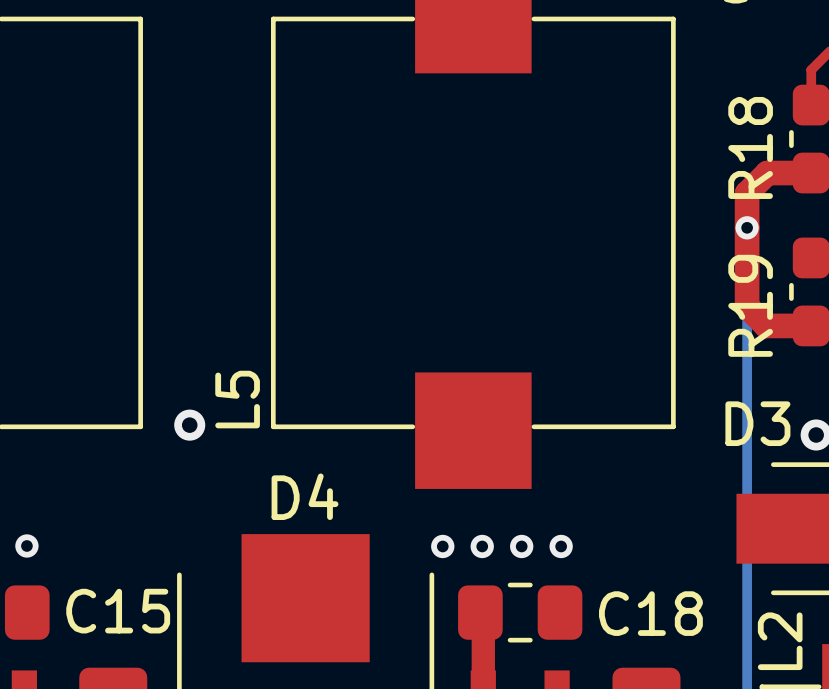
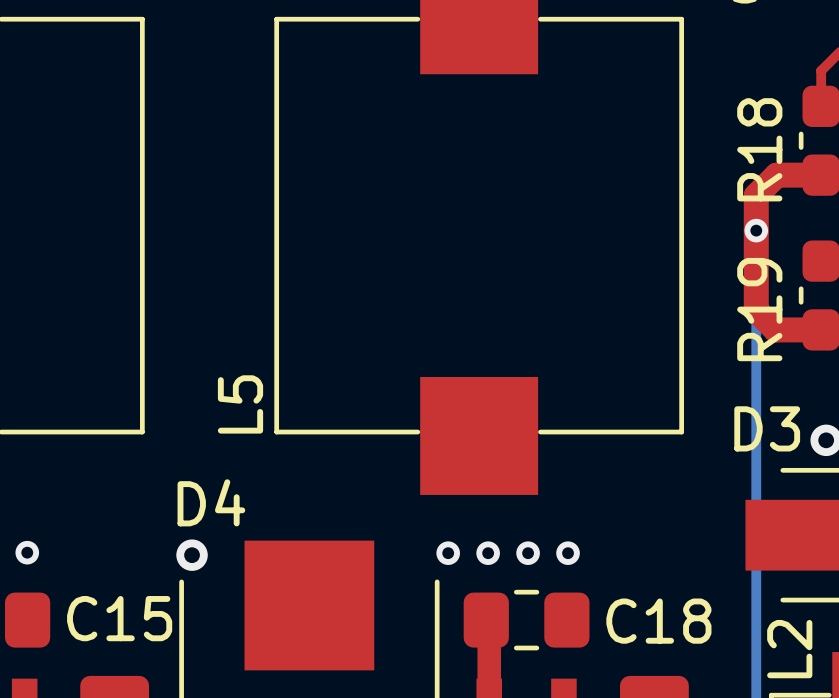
via position: (189, 425) -> (192, 555)
D4 name position: D4 (305, 496) -> D4 (211, 502)

